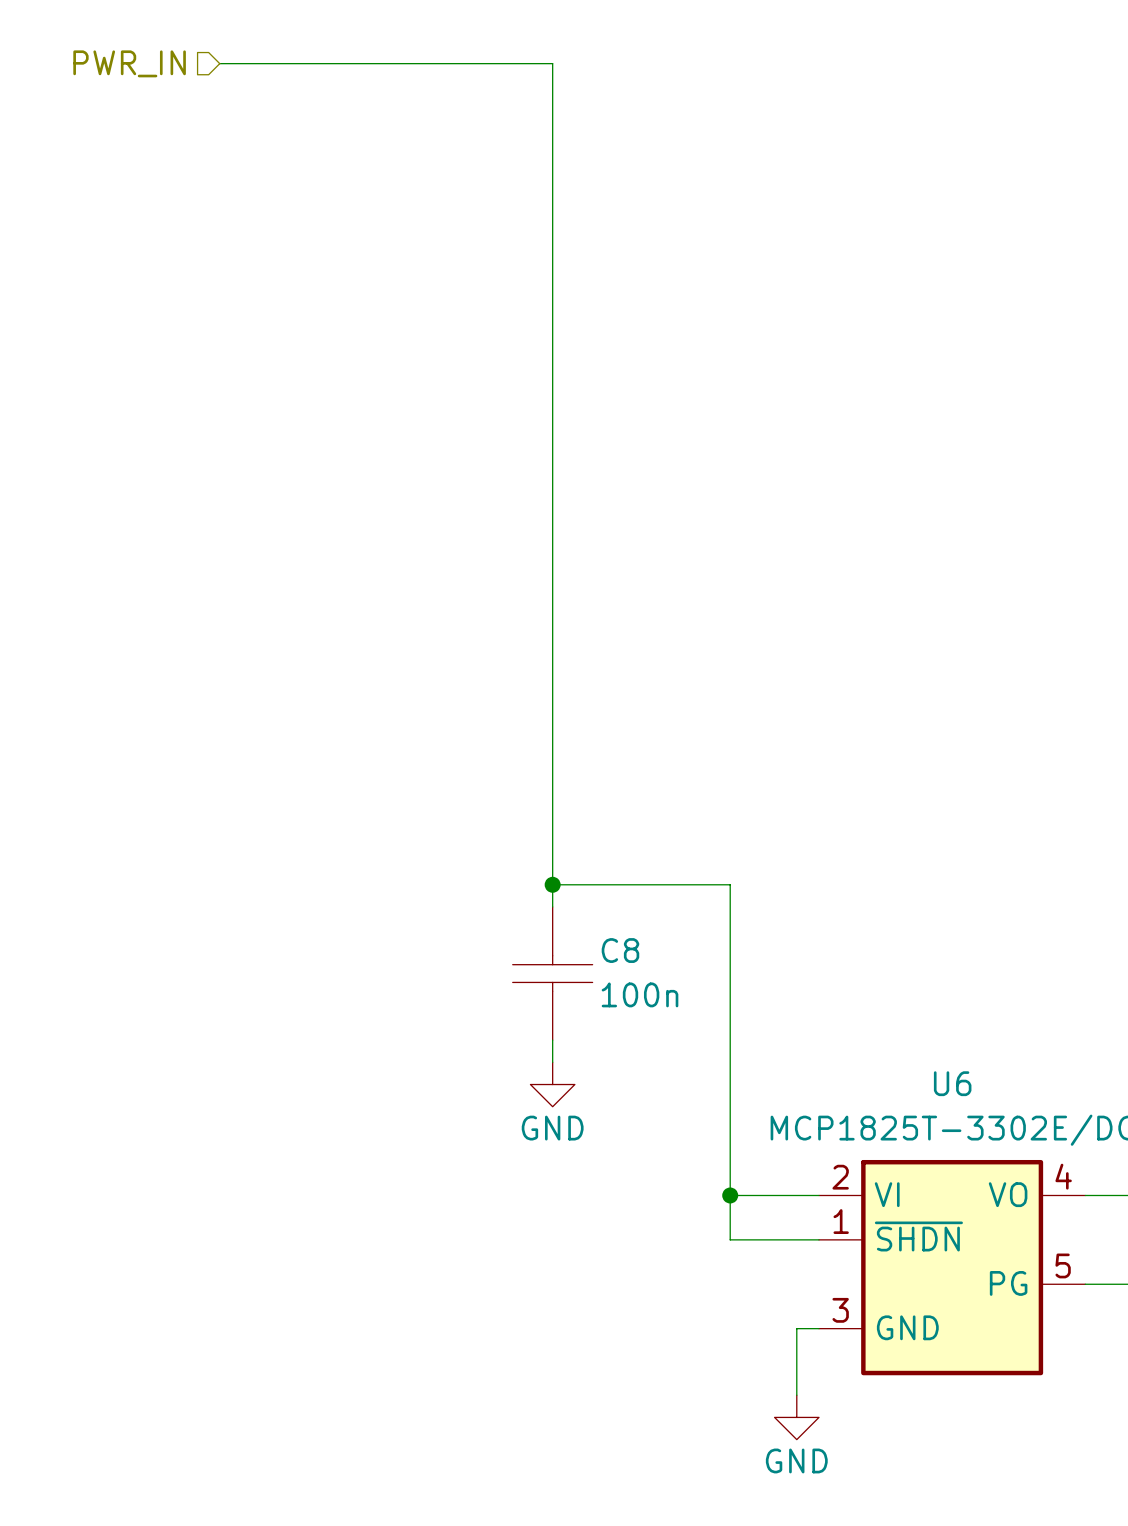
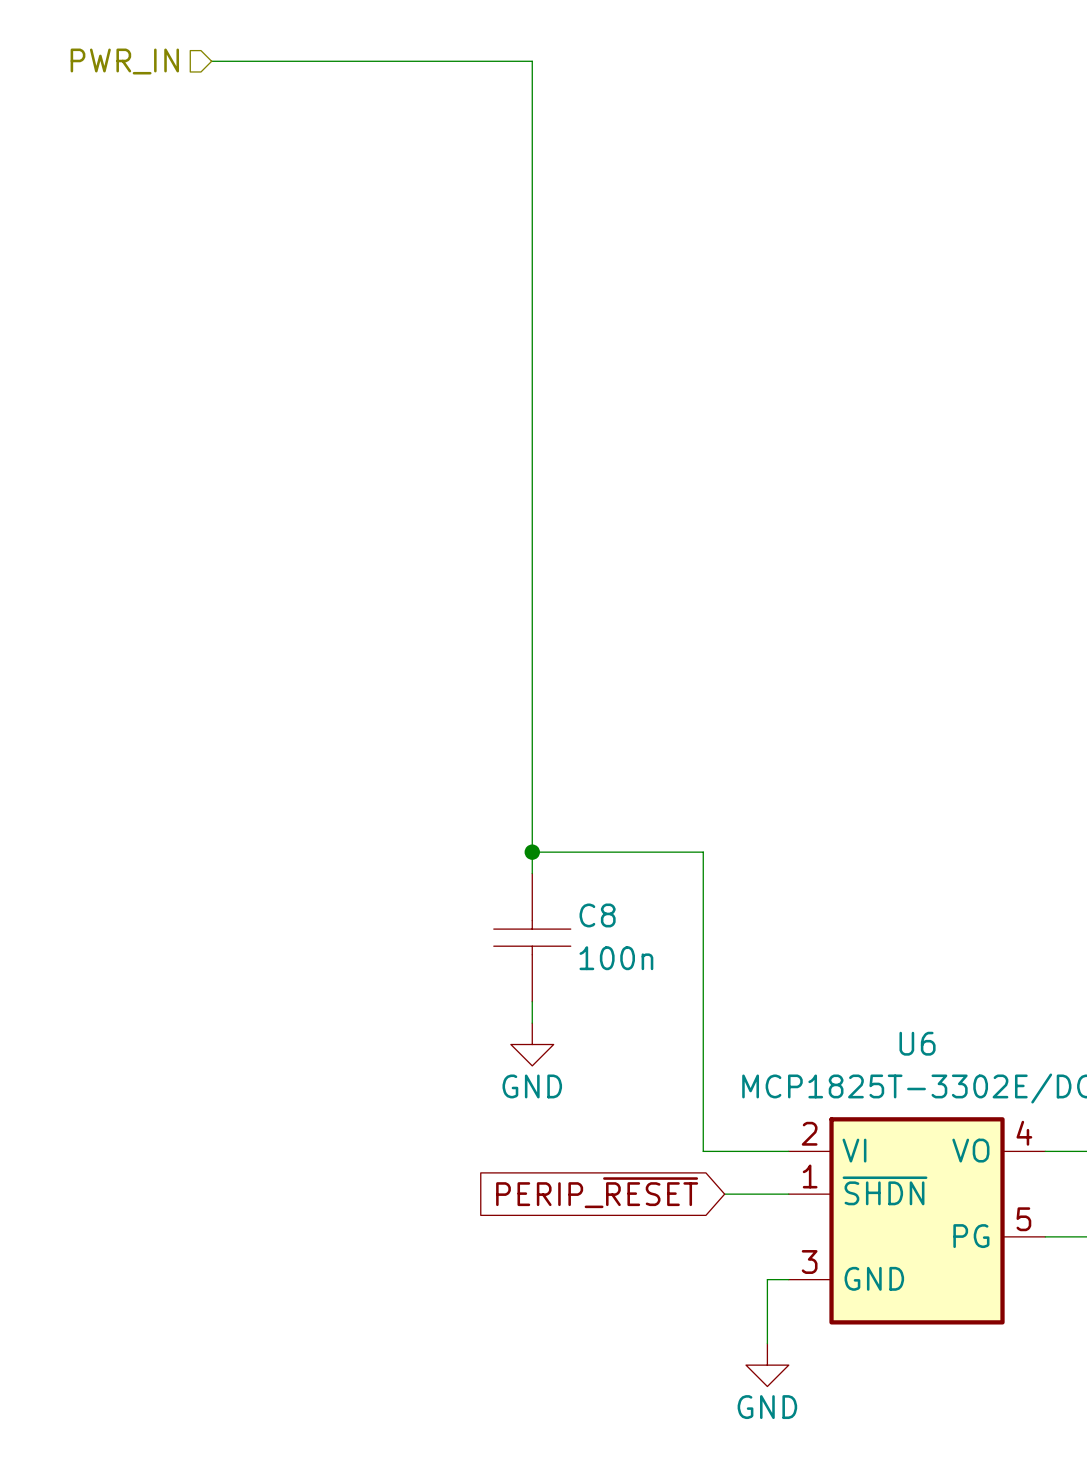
wire: (730, 1195) (730, 1239) (752, 1239) -> none
junction: (730, 1195) -> none
global label: none -> PERIP_~{RESET} (597, 1192)

